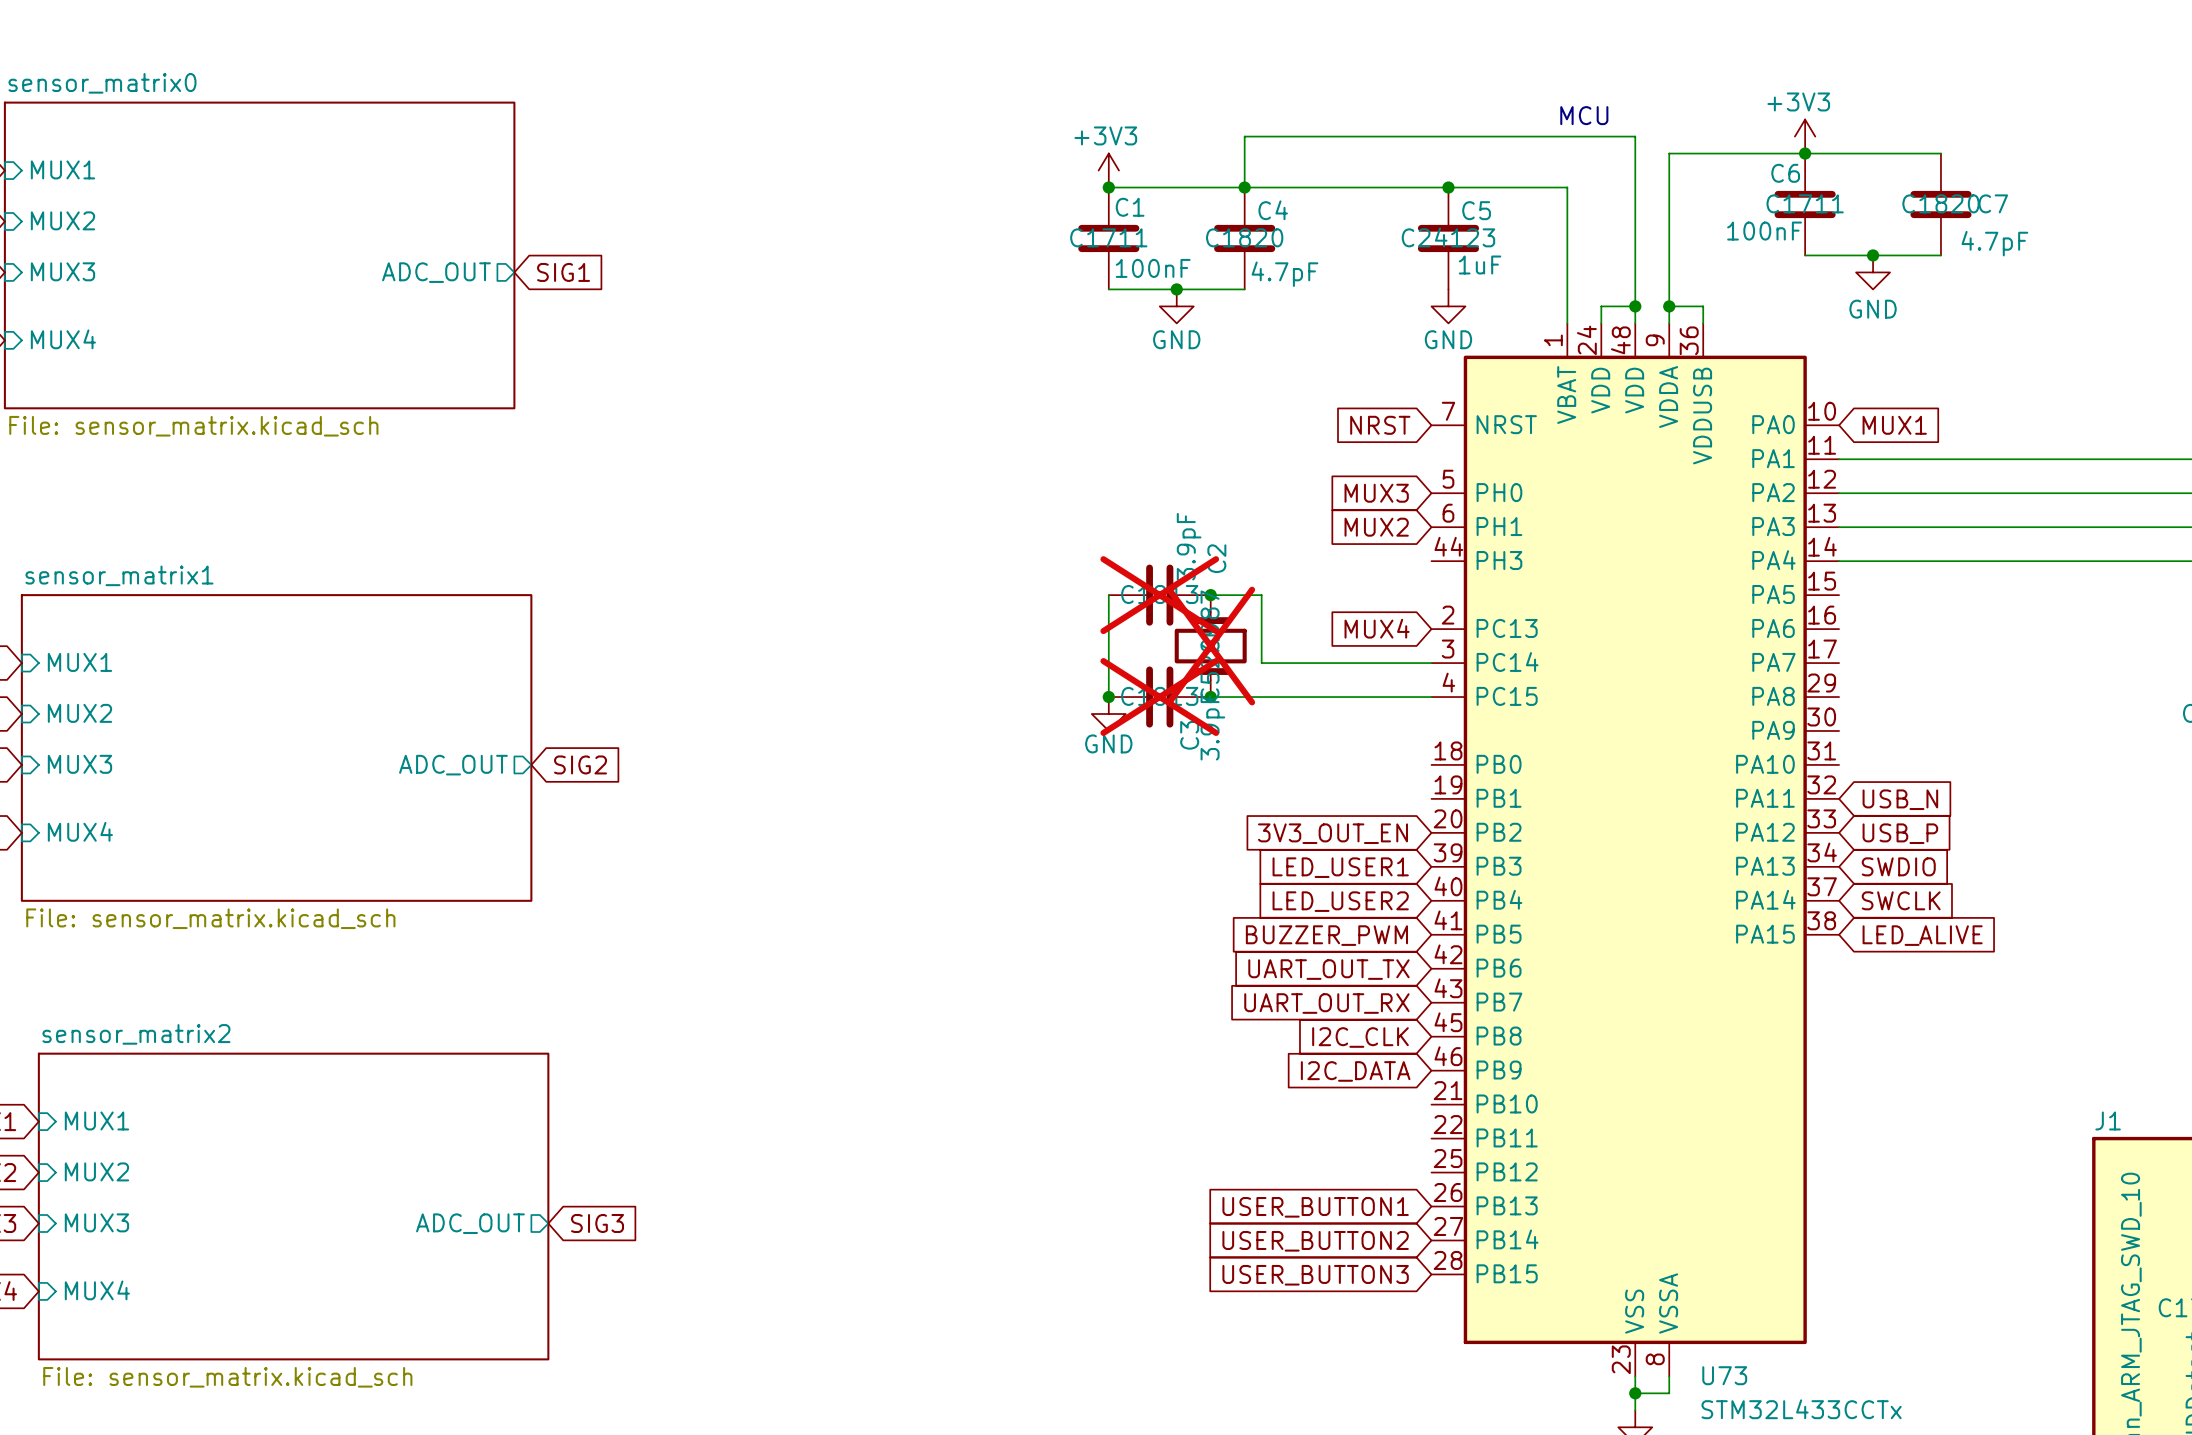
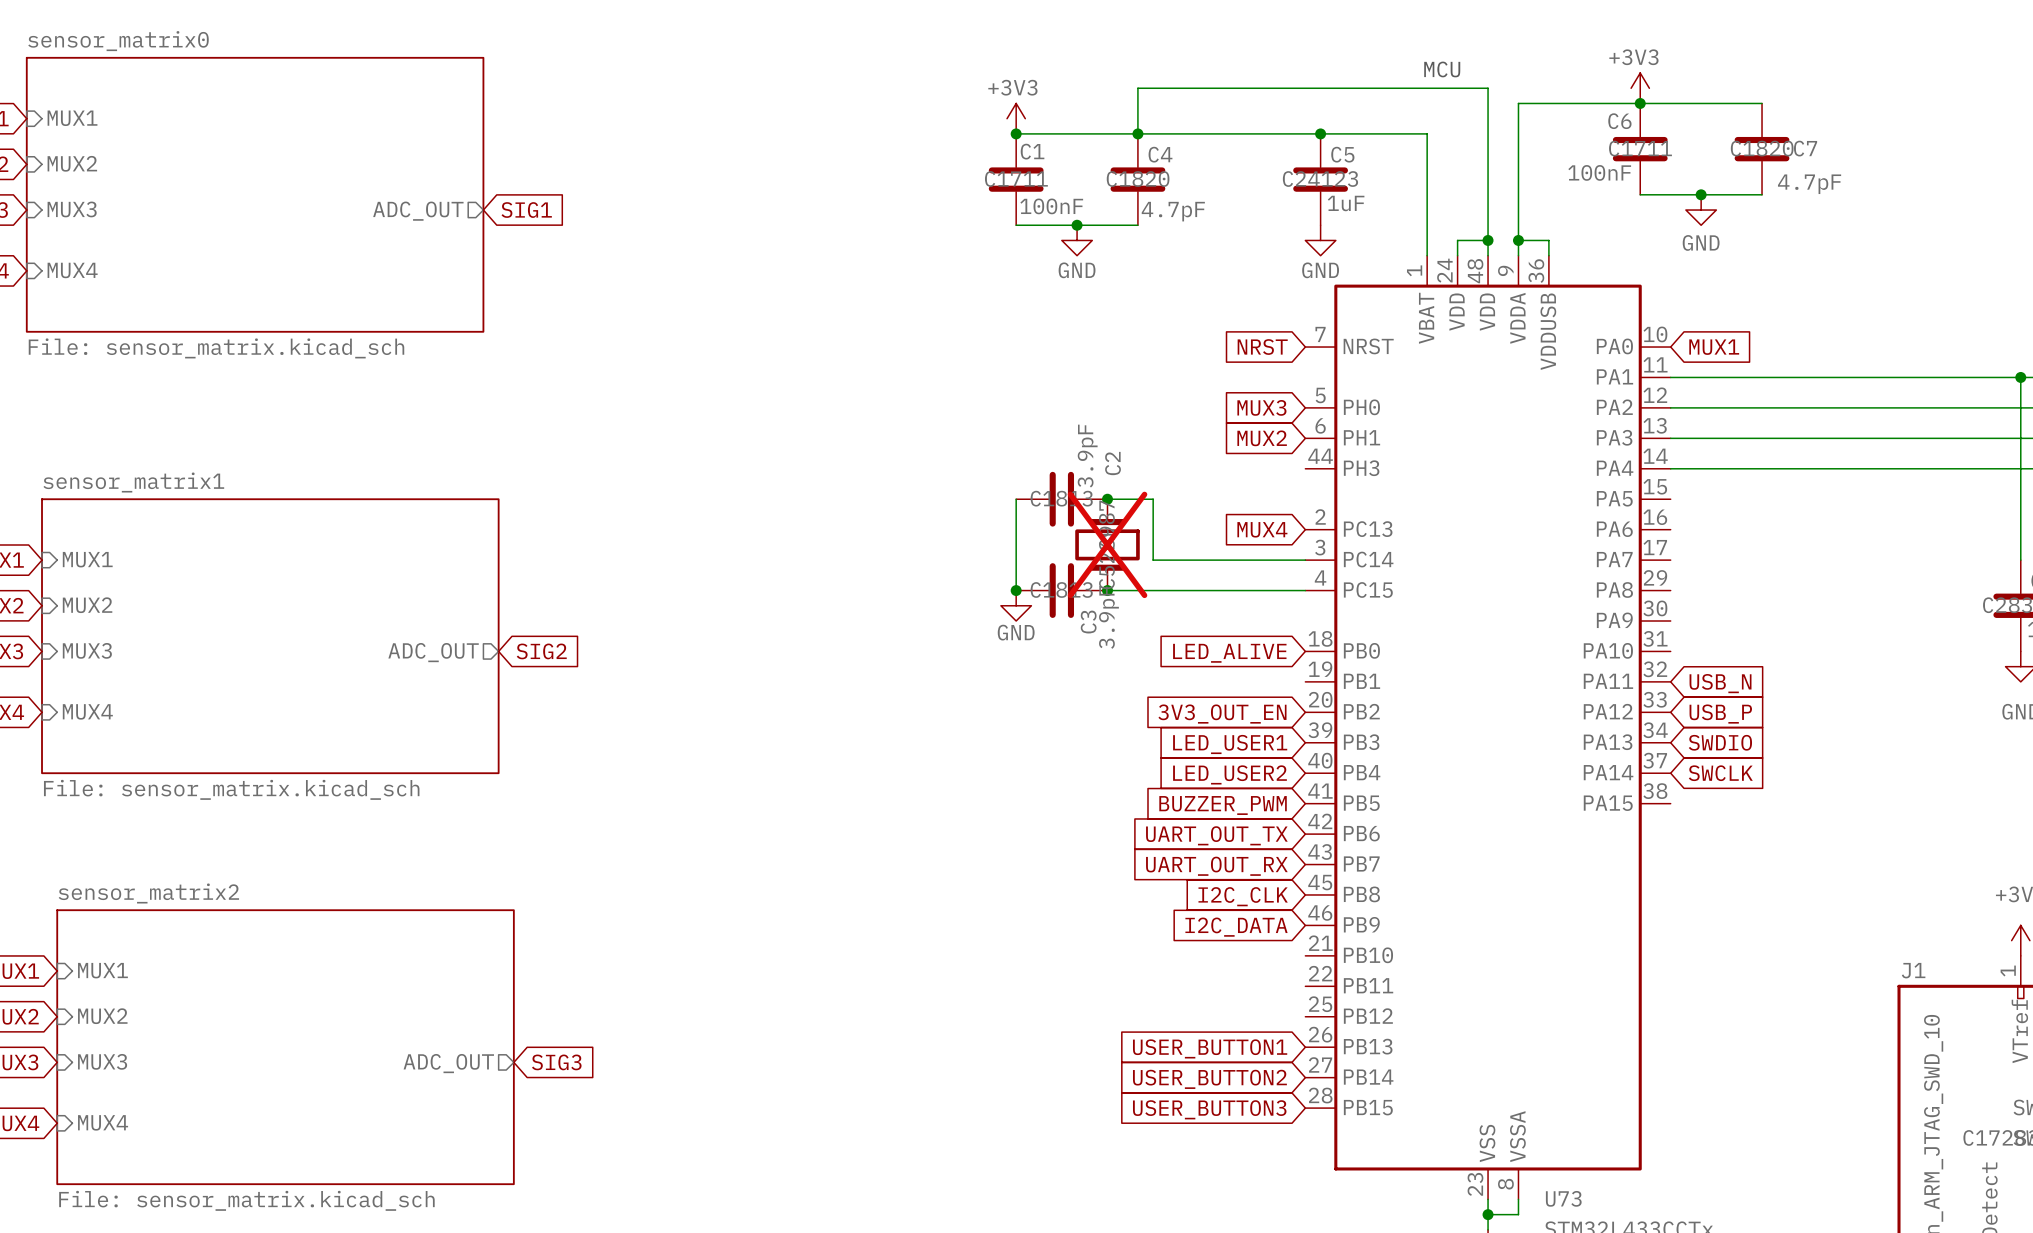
C2 do-not-place cross: (1159, 595) -> none
C3 do-not-place cross: (1159, 697) -> none
global label: none -> LED_ALIVE (1229, 653)
global label: LED_ALIVE (1922, 935) -> none

